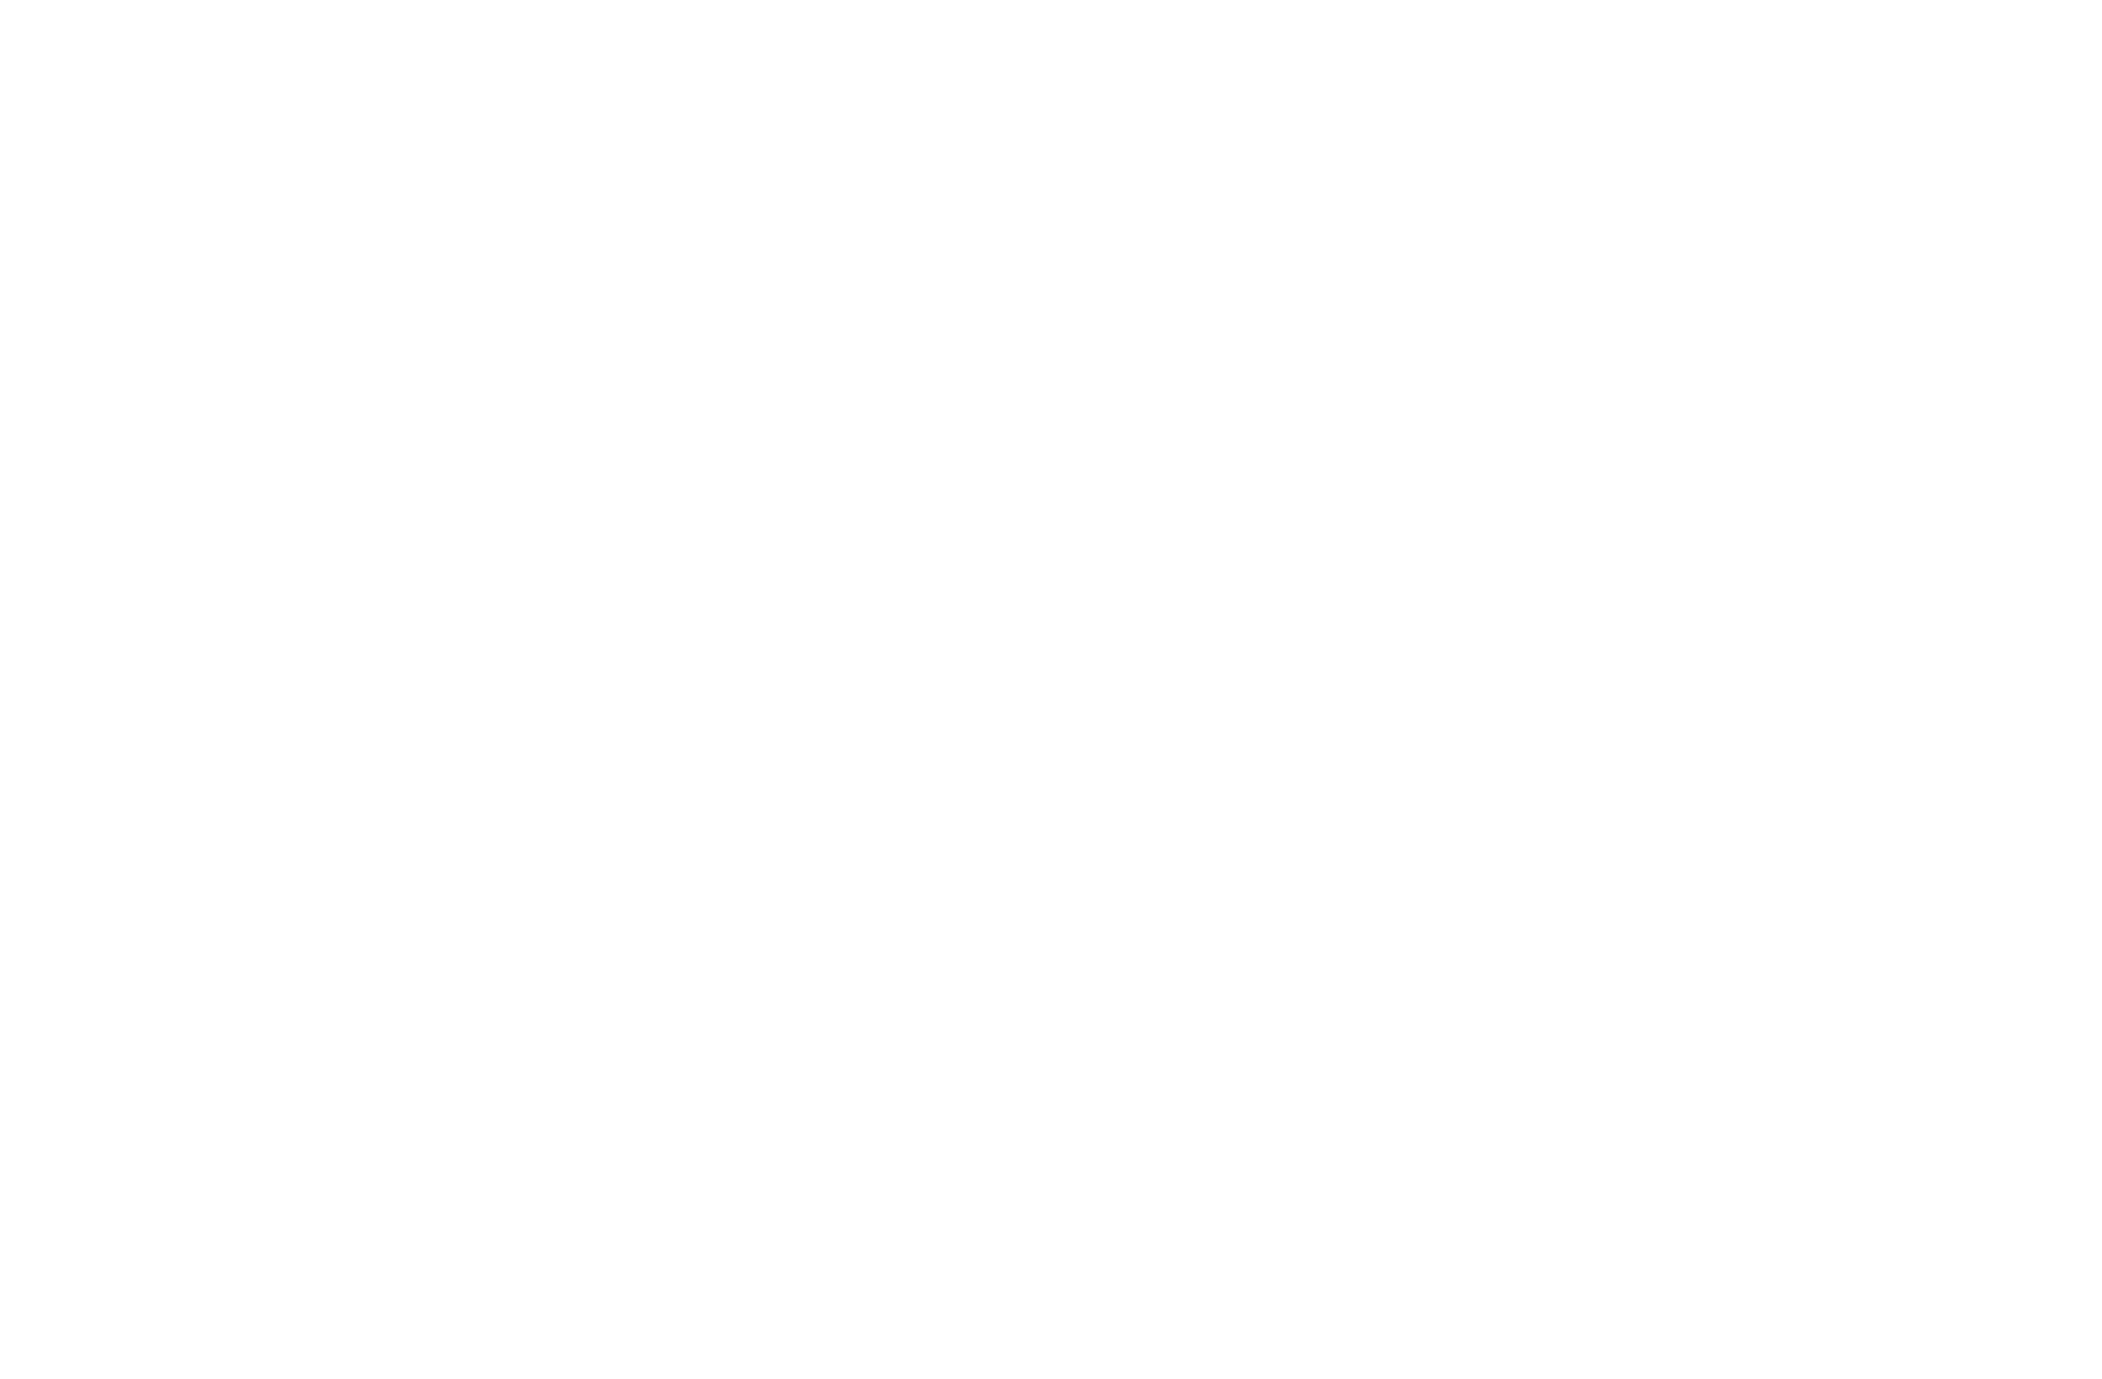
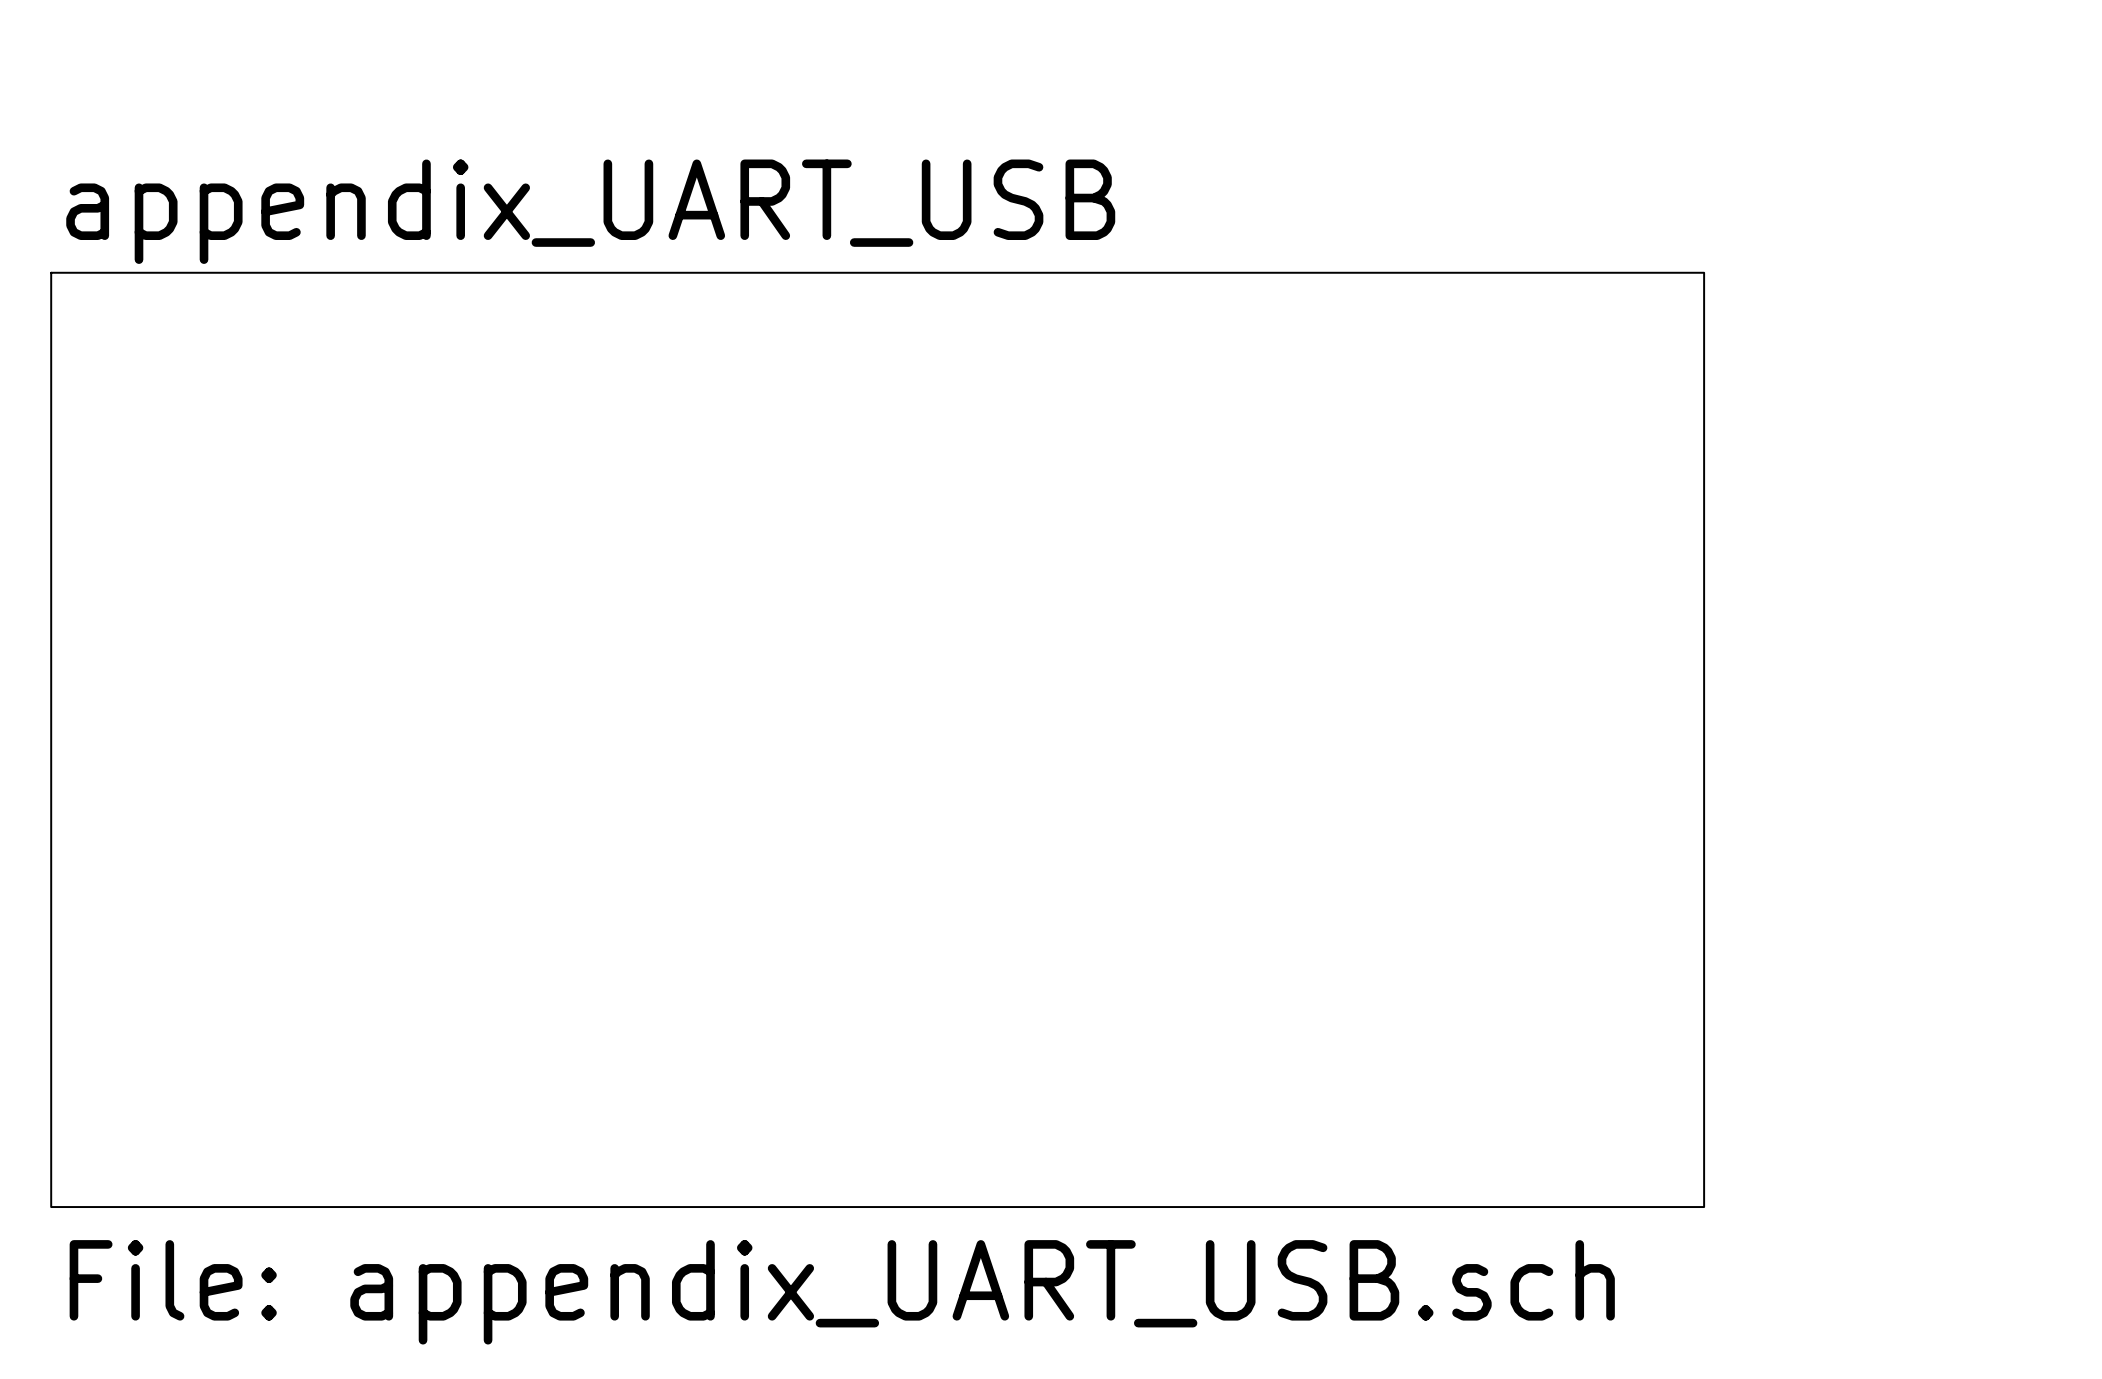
sheet appendix_UART_USB: none -> File: appendix_UART_USB.sch (877, 739)

